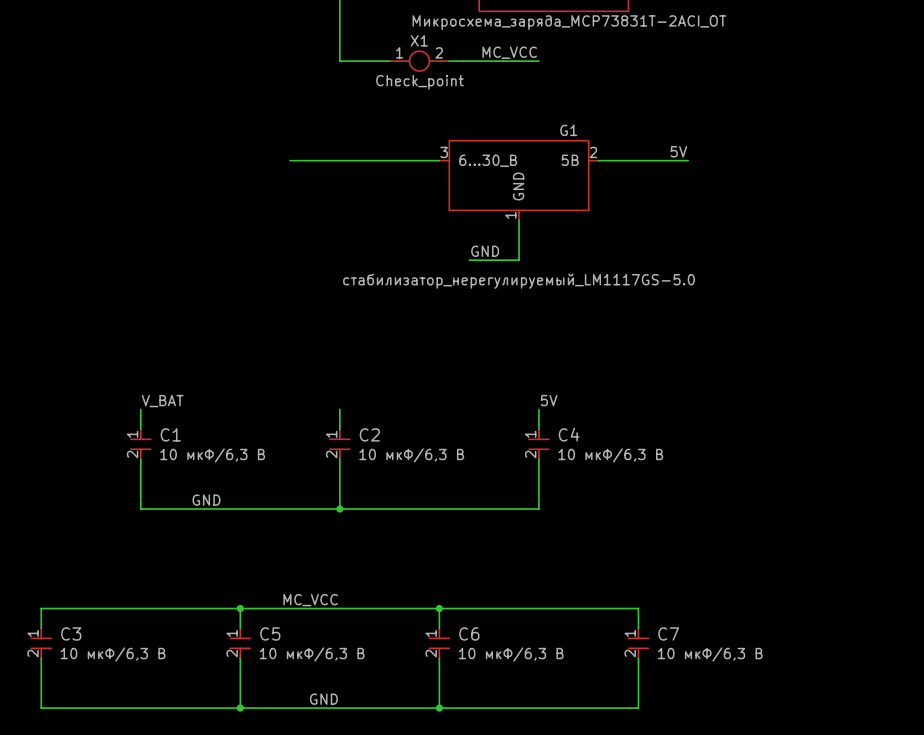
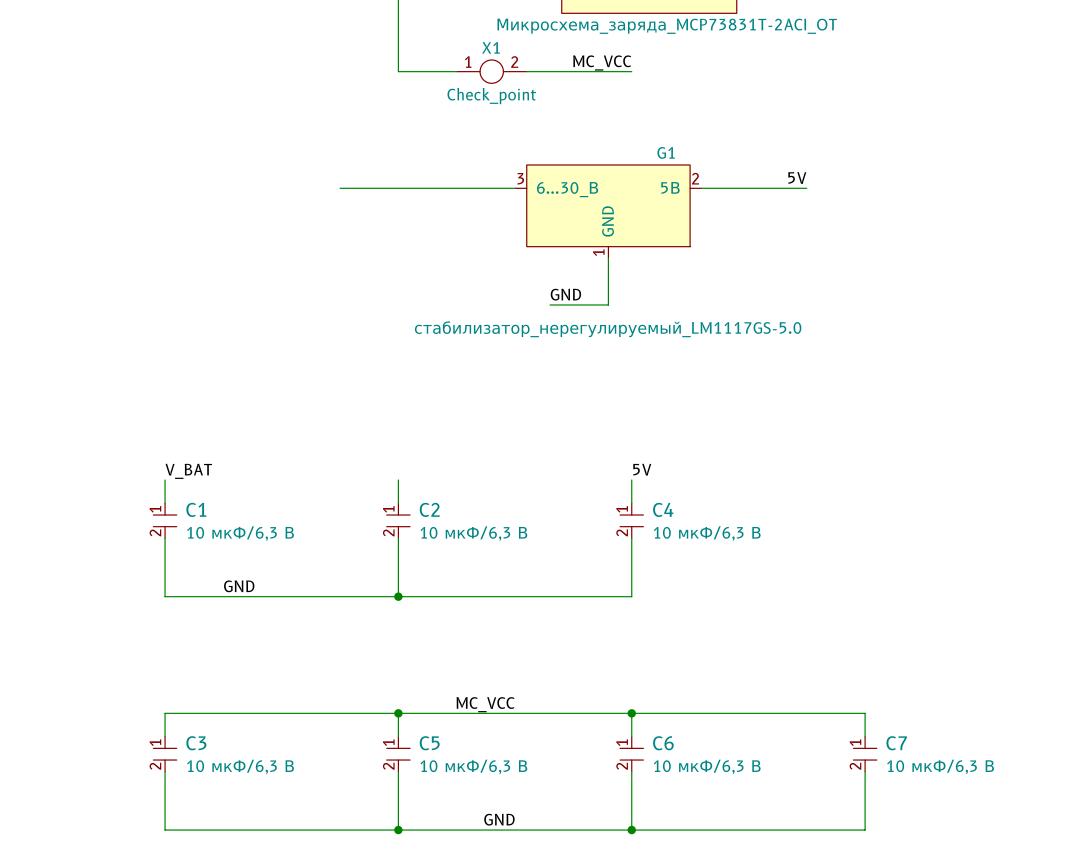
label position: MC_VCC (310, 600) -> MC_VCC (485, 704)
wire: (140, 608) (41, 608) (41, 628) -> (165, 713) (165, 736)
wire: (240, 608) (240, 628) -> none
junction: (240, 608) -> none
junction: none -> (398, 713)
wire: (439, 608) (439, 628) -> (398, 713) (398, 736)
junction: (439, 608) -> none
wire: none -> (631, 713) (631, 736)
junction: none -> (631, 713)
wire: (638, 608) (638, 628) -> (748, 713) (865, 713) (865, 736)
C3 position: (41, 643) -> (165, 754)
C5 position: (240, 643) -> (398, 754)
C6 position: (439, 643) -> (631, 754)
C7 position: (638, 643) -> (865, 754)
wire: (41, 658) (41, 708) (140, 708) -> (165, 771) (165, 830)
wire: (240, 658) (240, 708) -> none
wire: (439, 658) (439, 708) -> (398, 771) (398, 830)
wire: none -> (631, 771) (631, 830)
wire: (638, 658) (638, 708) -> (865, 771) (865, 830) (748, 830)
label position: GND (323, 699) -> GND (499, 819)
junction: (240, 708) -> none
junction: none -> (398, 830)
junction: (439, 708) -> none
junction: none -> (631, 830)

